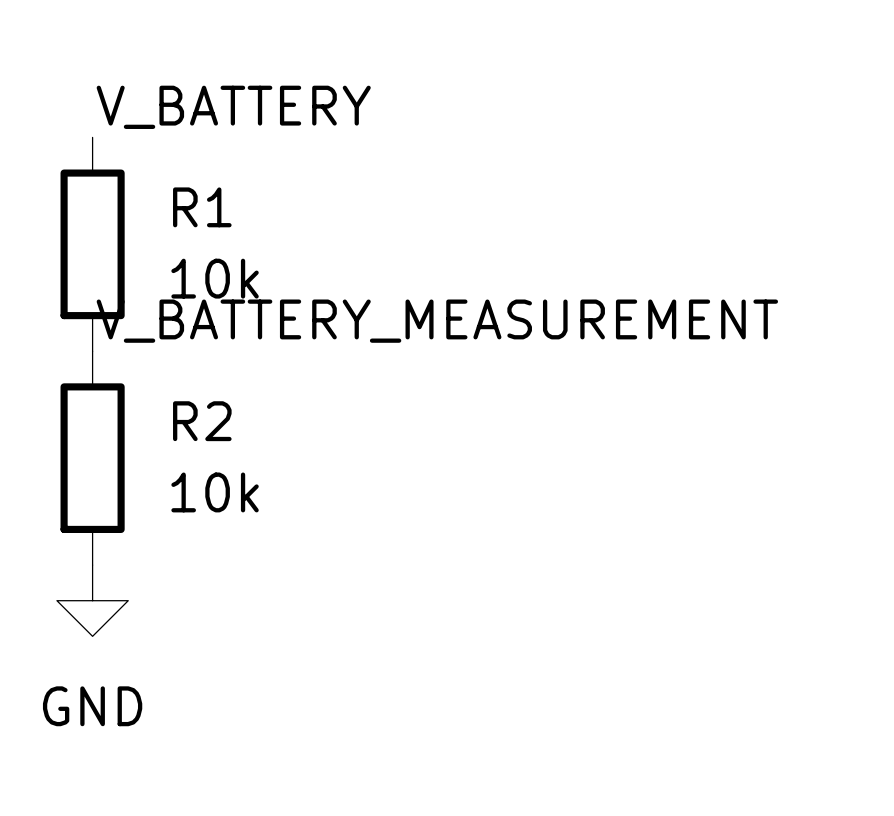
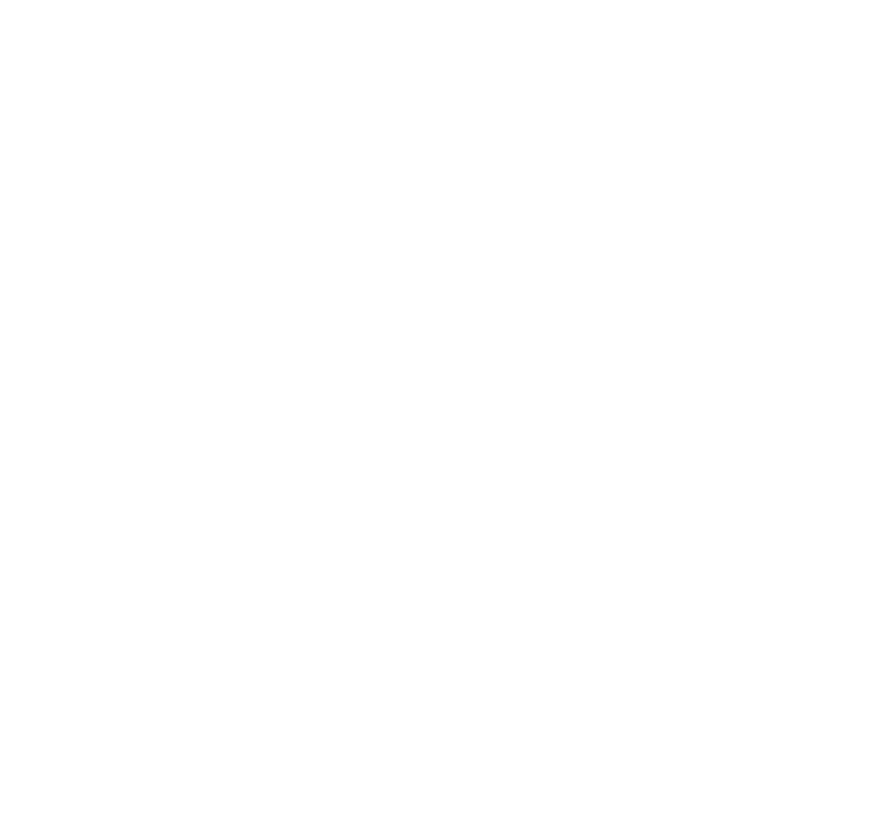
label: V_BATTERY (233, 107) -> none
R1: 10k (92, 244) -> none
label: V_BATTERY_MEASUREMENT (437, 321) -> none
R2: 10k (92, 458) -> none
power symbol: GND (92, 600) -> none

